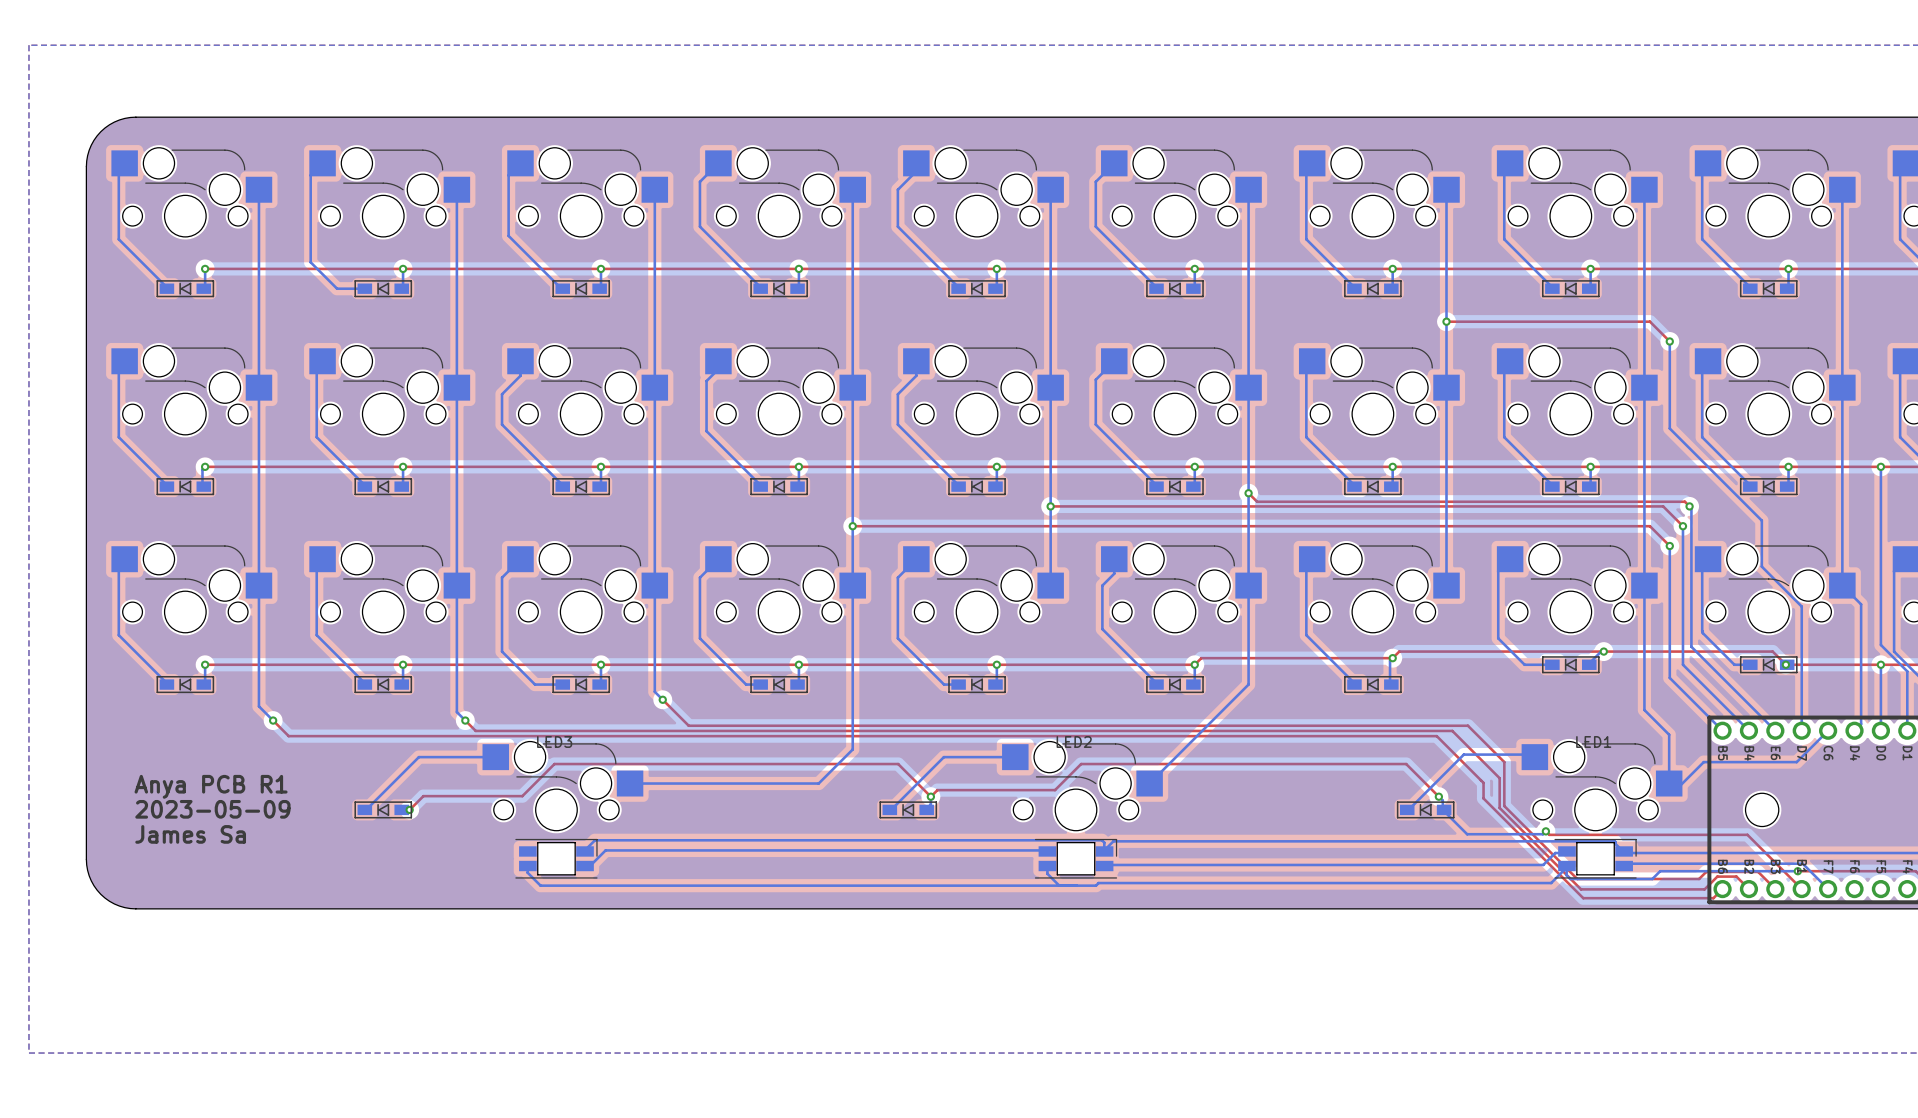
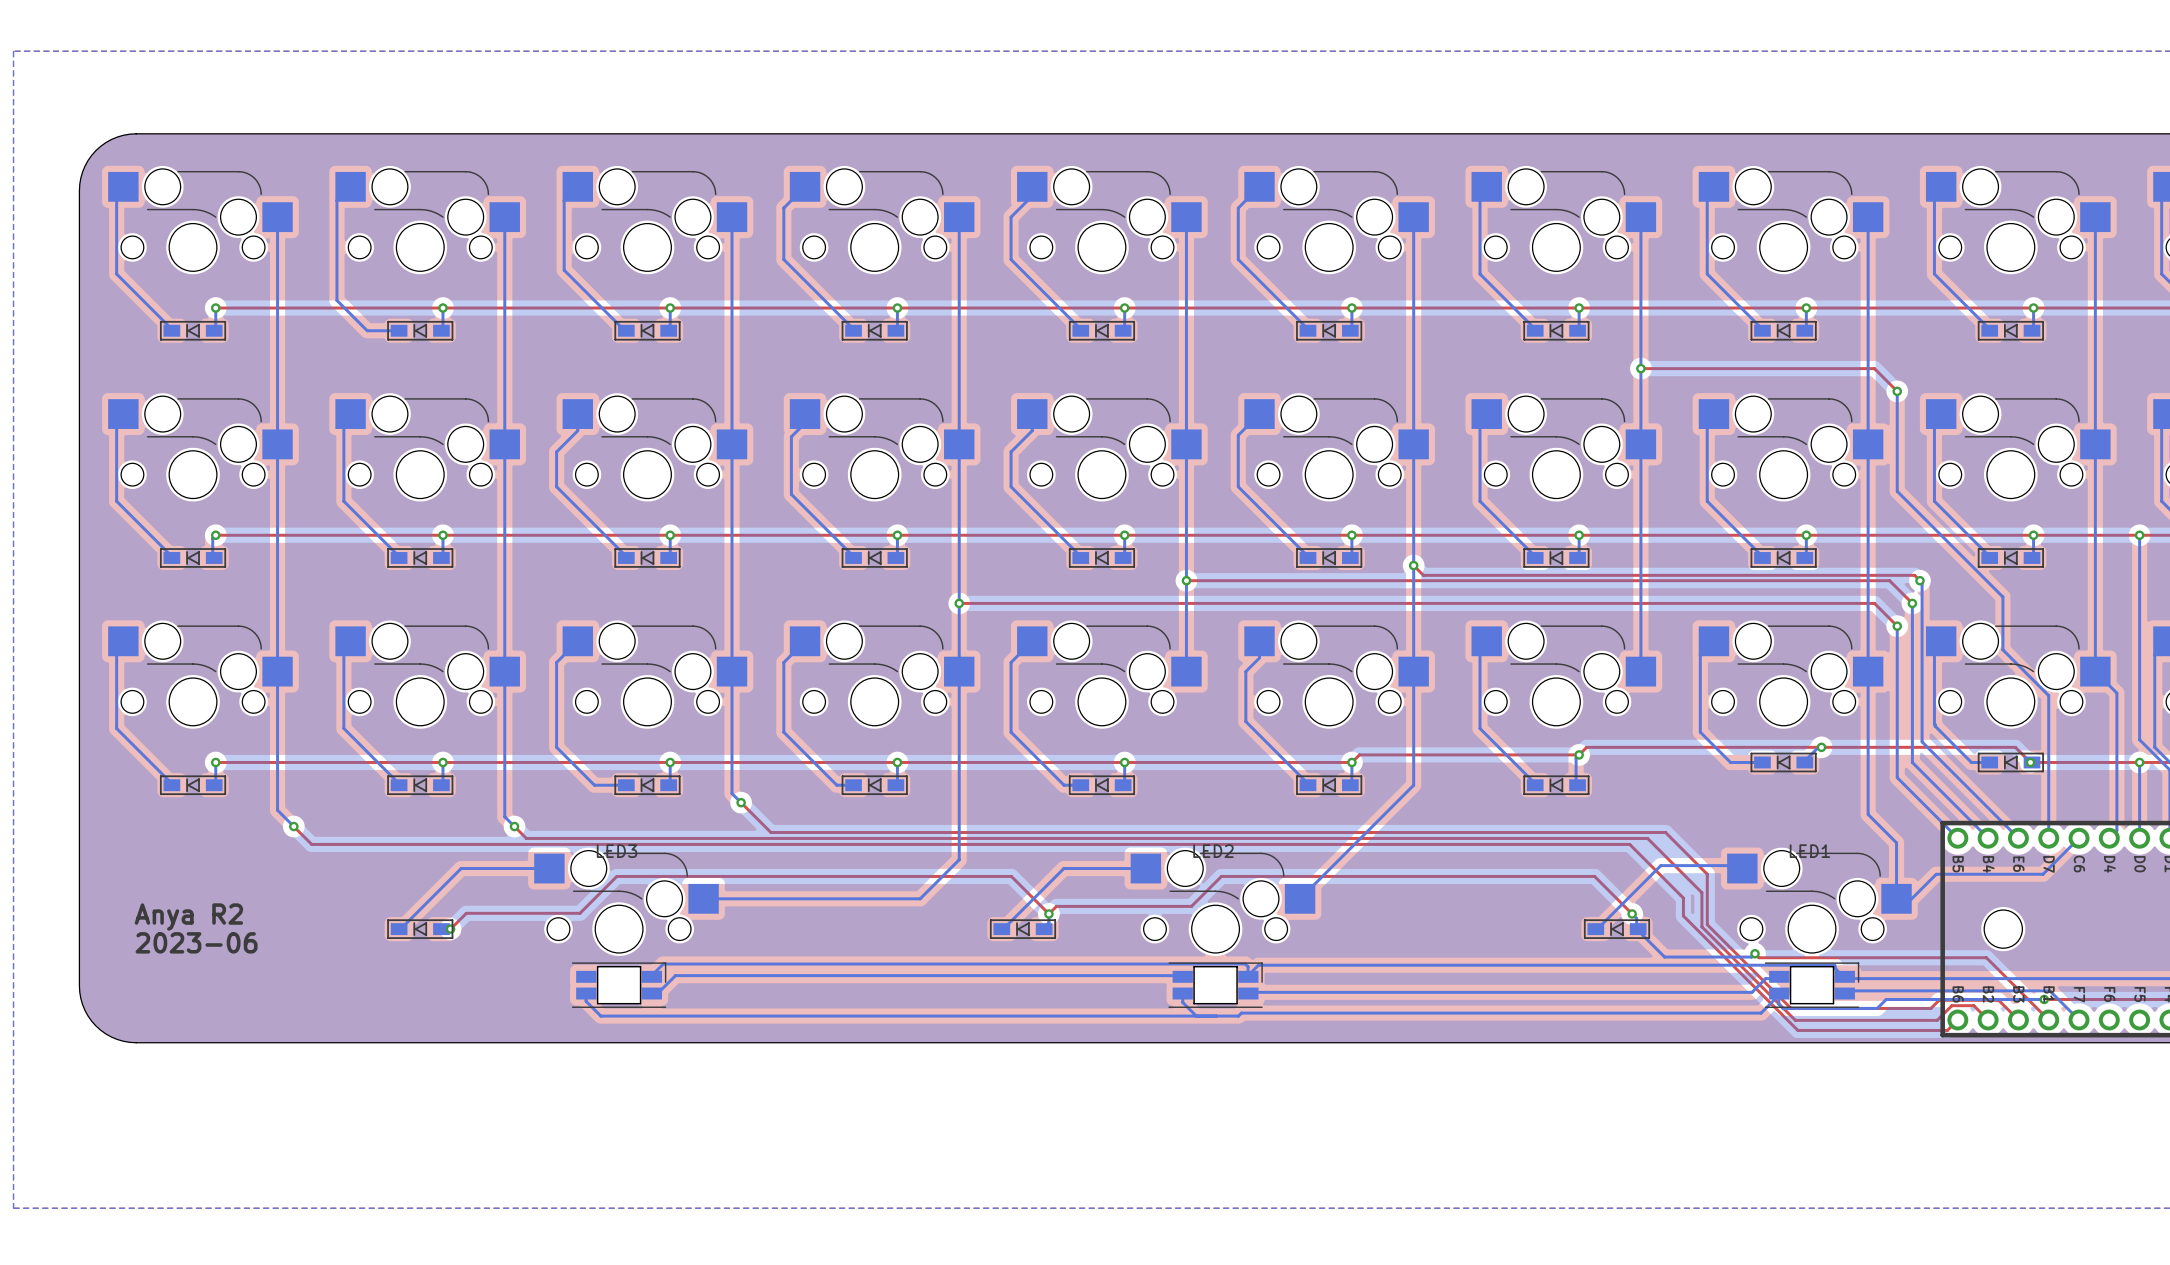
text: Anya PCB R1 (211, 786) -> Anya R2 (188, 917)
text: 2023-05-09 (212, 809) -> 2023-06 (196, 942)
text: James Sa (190, 834) -> none

